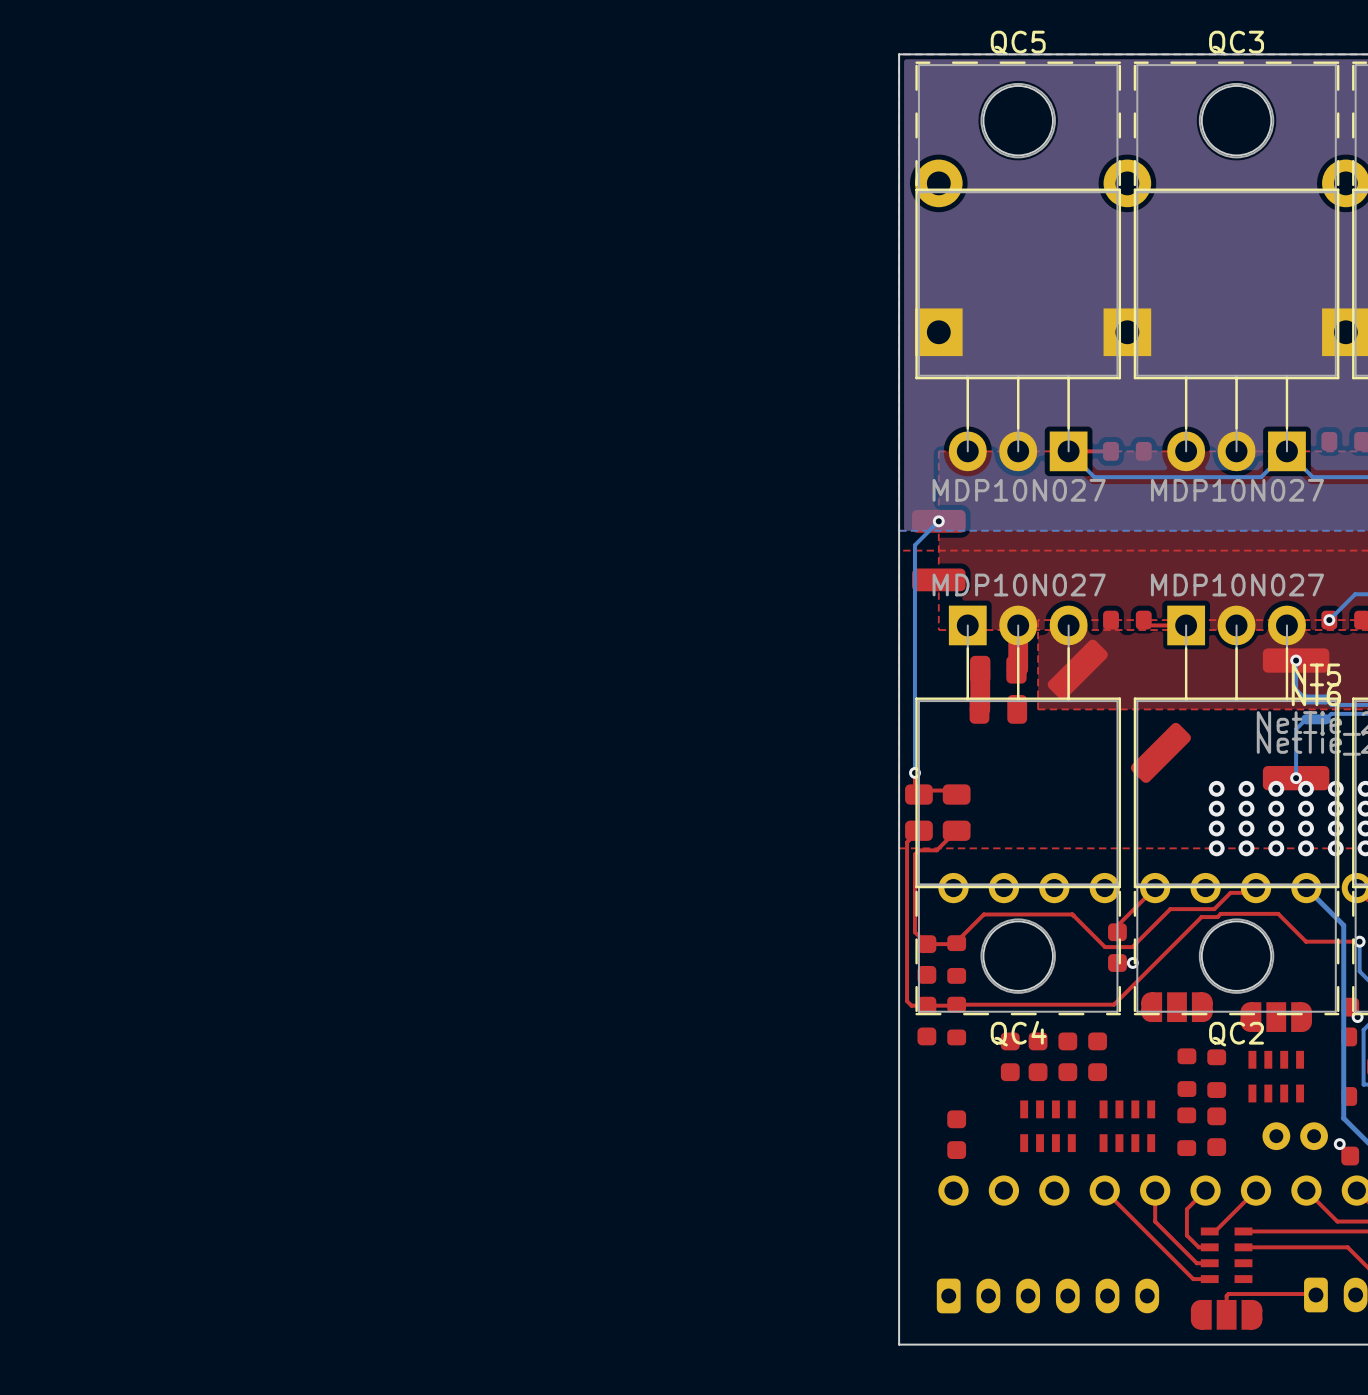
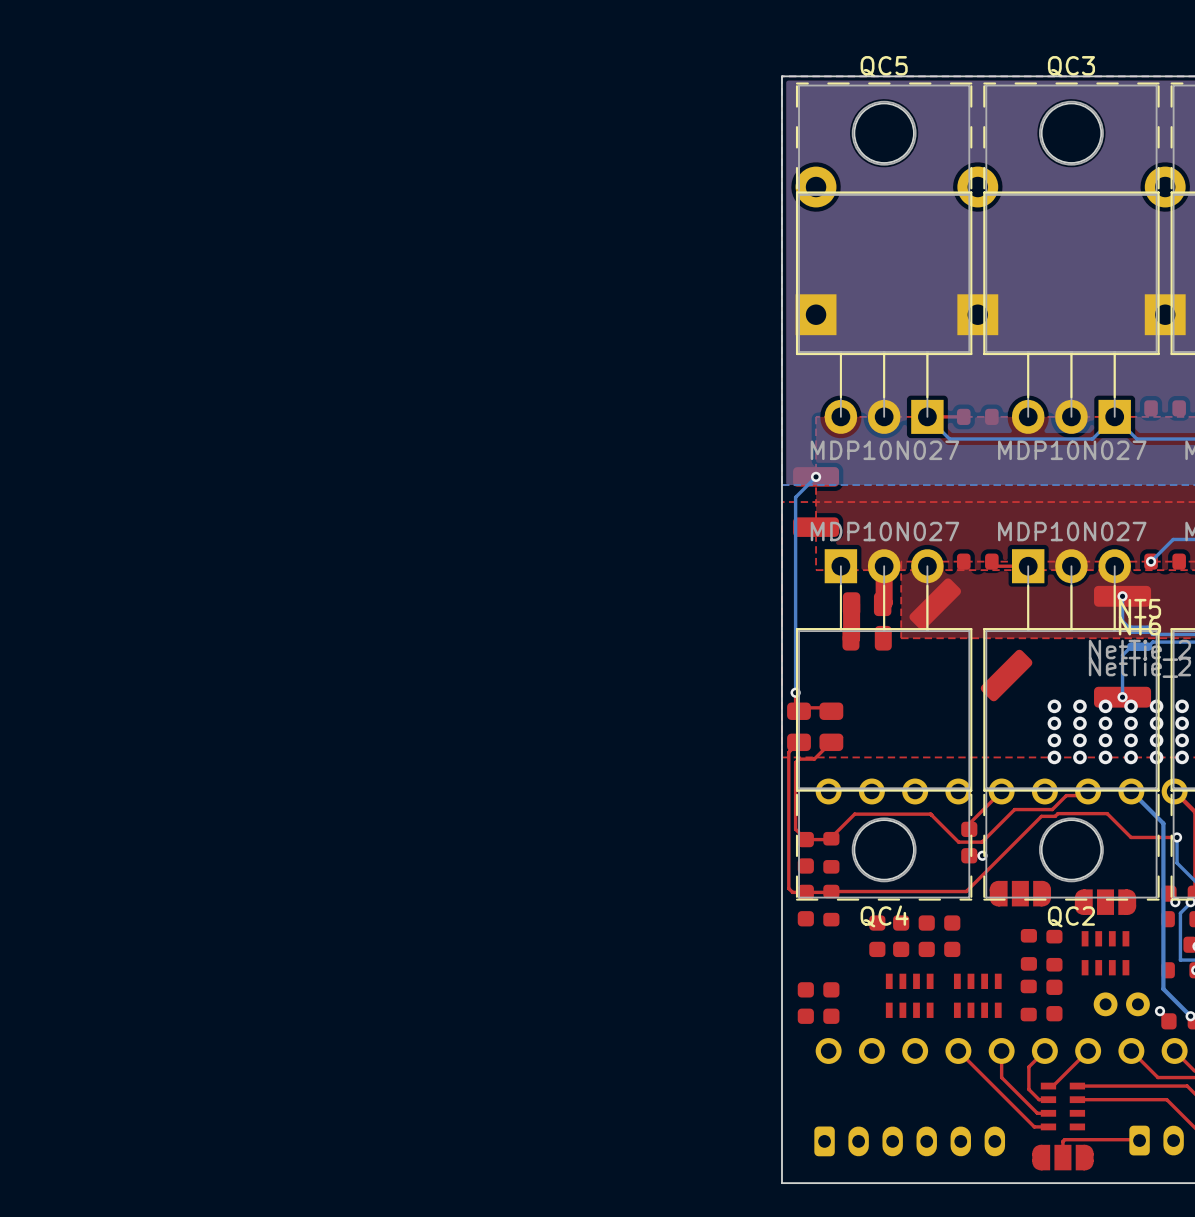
part: none -> (805, 1003)

